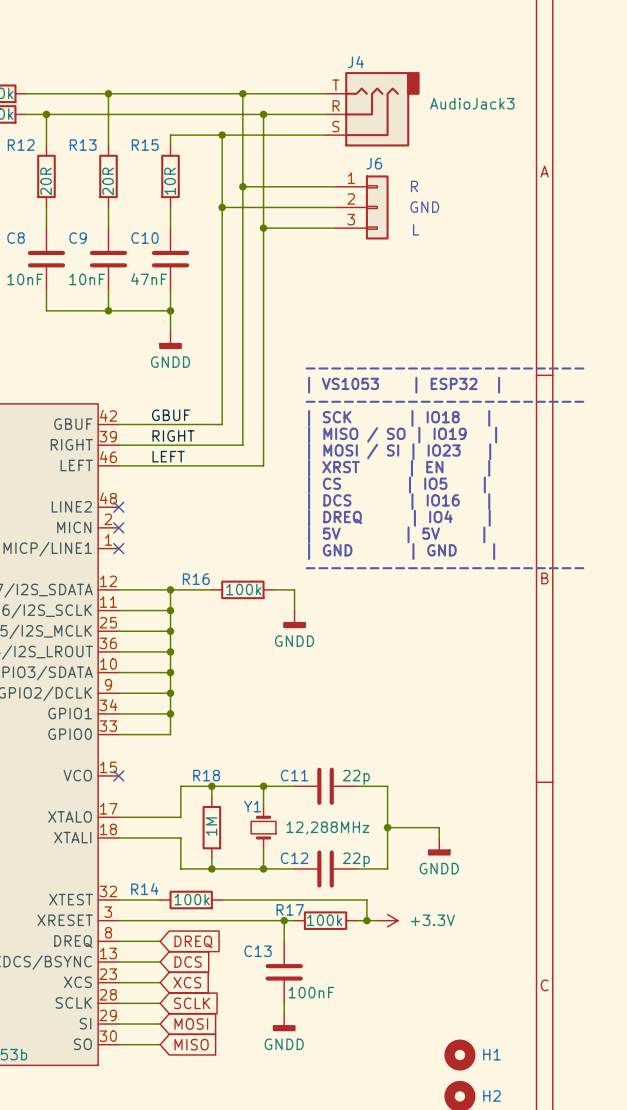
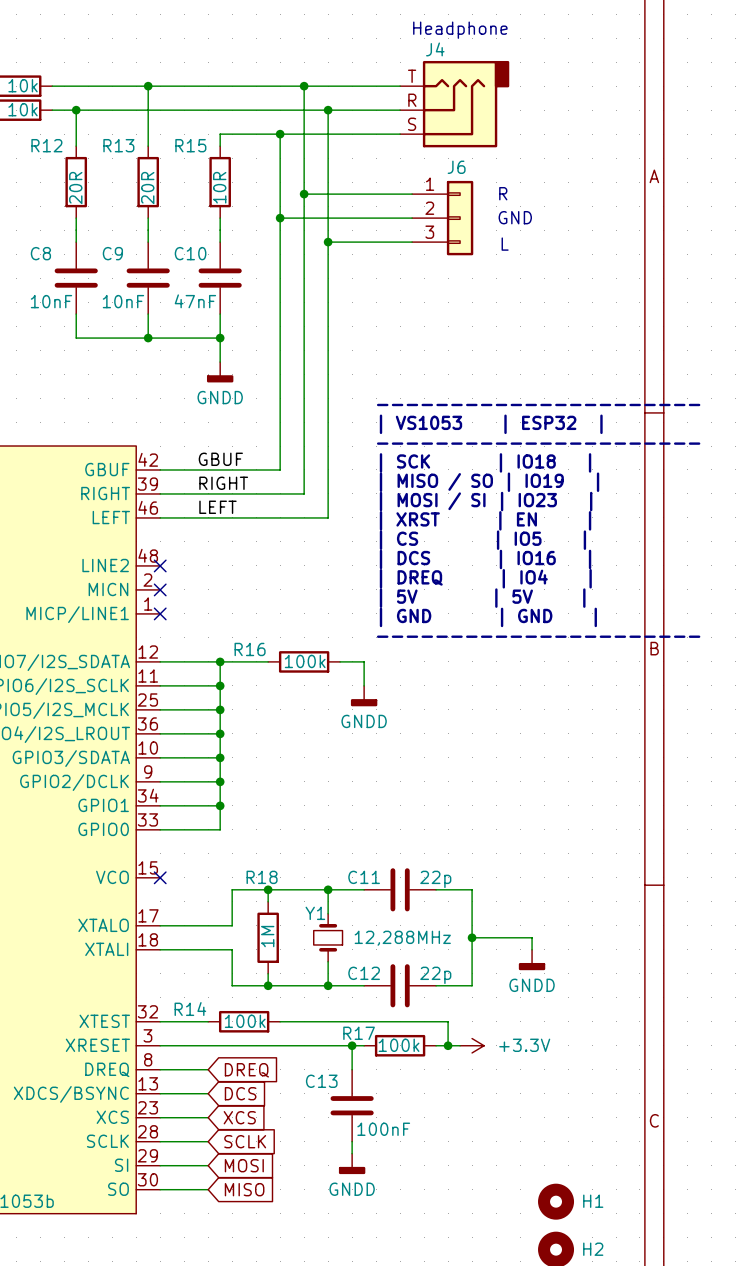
text: none -> Headphone (460, 30)
J4 value: AudioJack3 (472, 103) -> none

